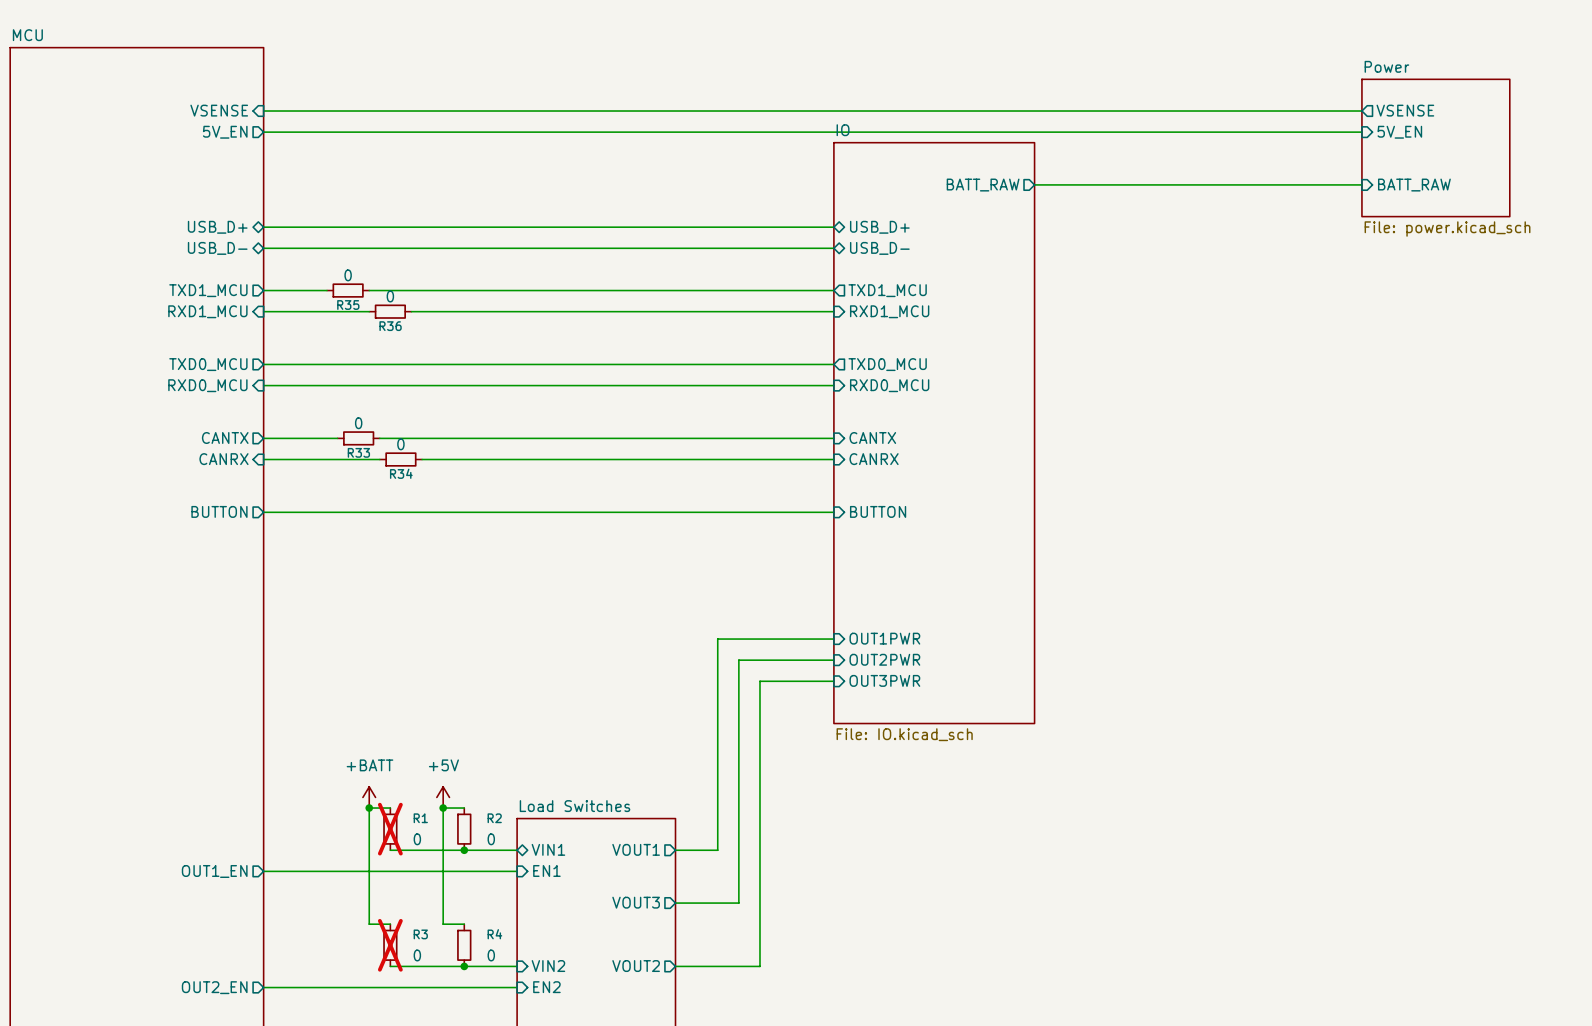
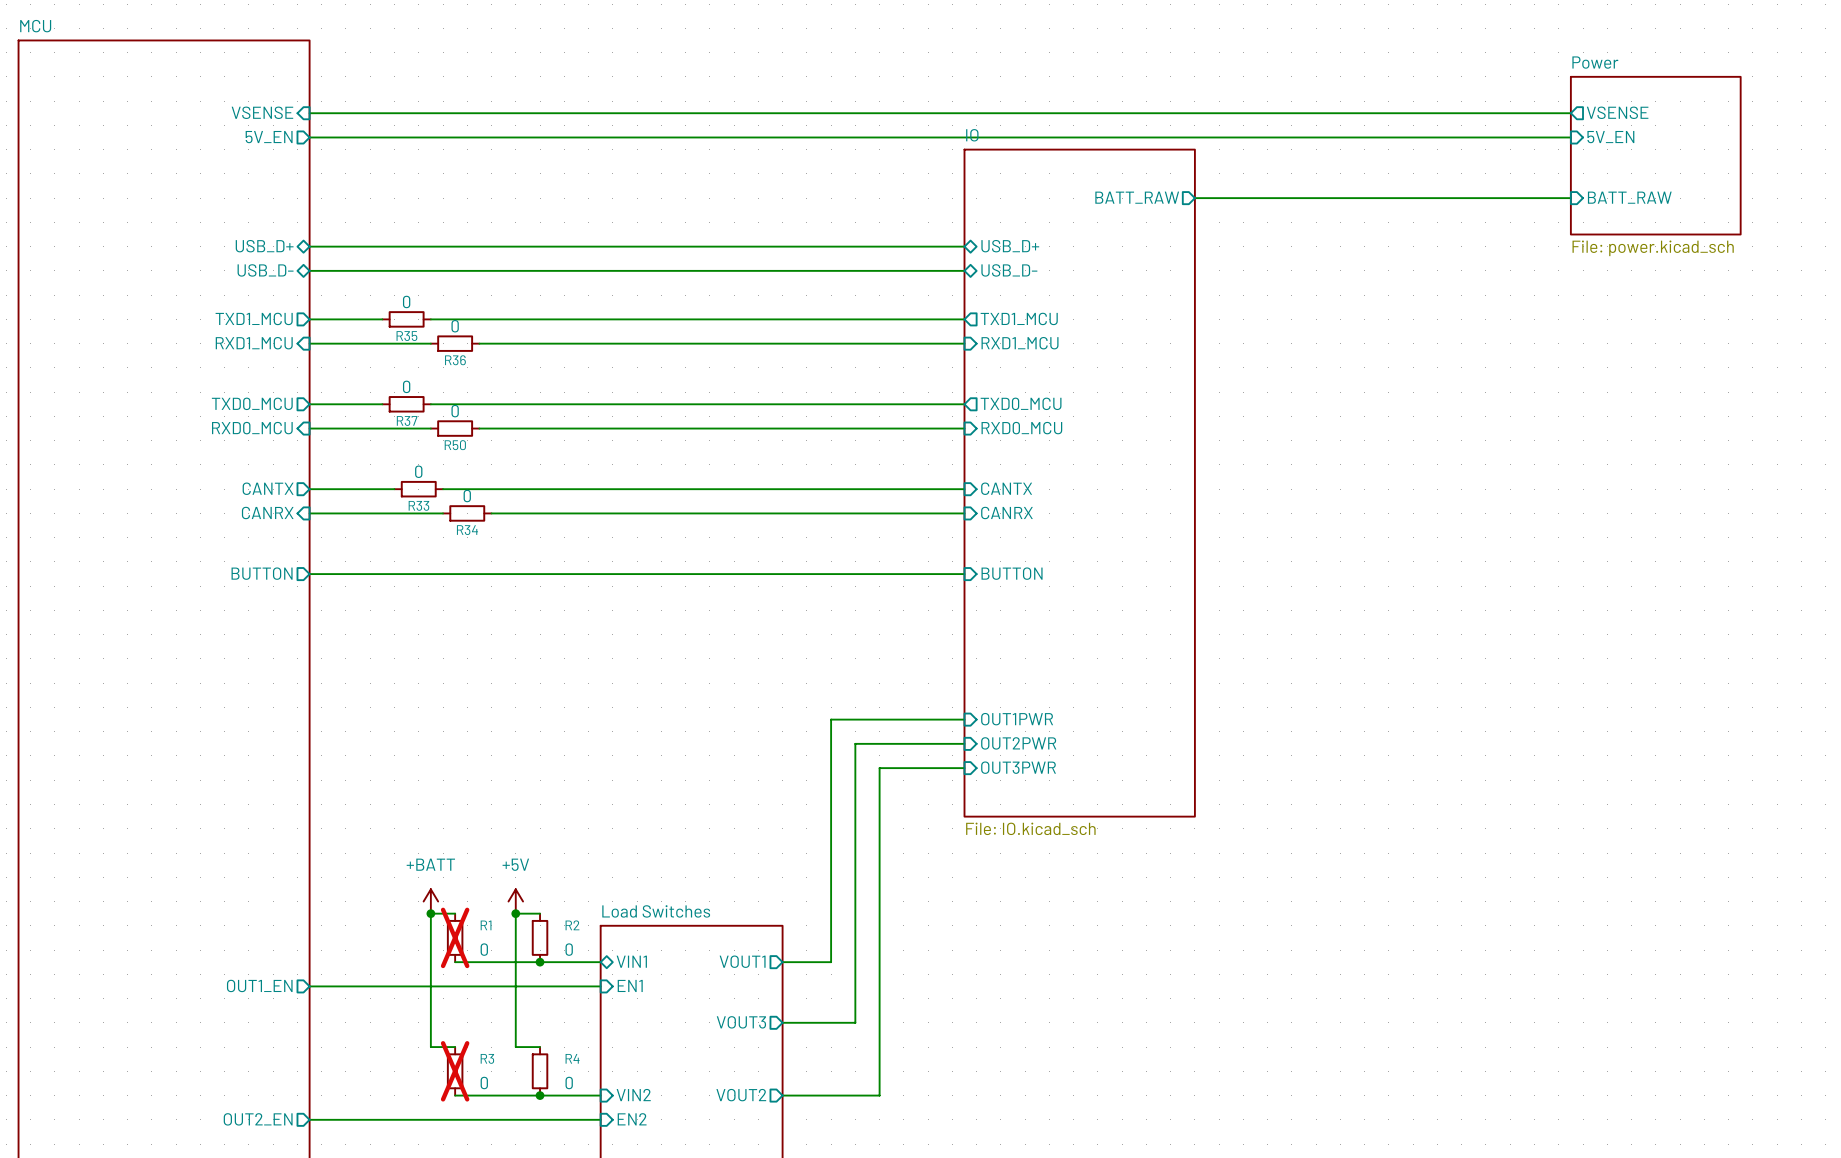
wire: (327, 364) (369, 364) -> none
R37: none -> 0 (406, 404)
wire: (369, 385) (411, 385) -> none
R50: none -> 0 (455, 428)

